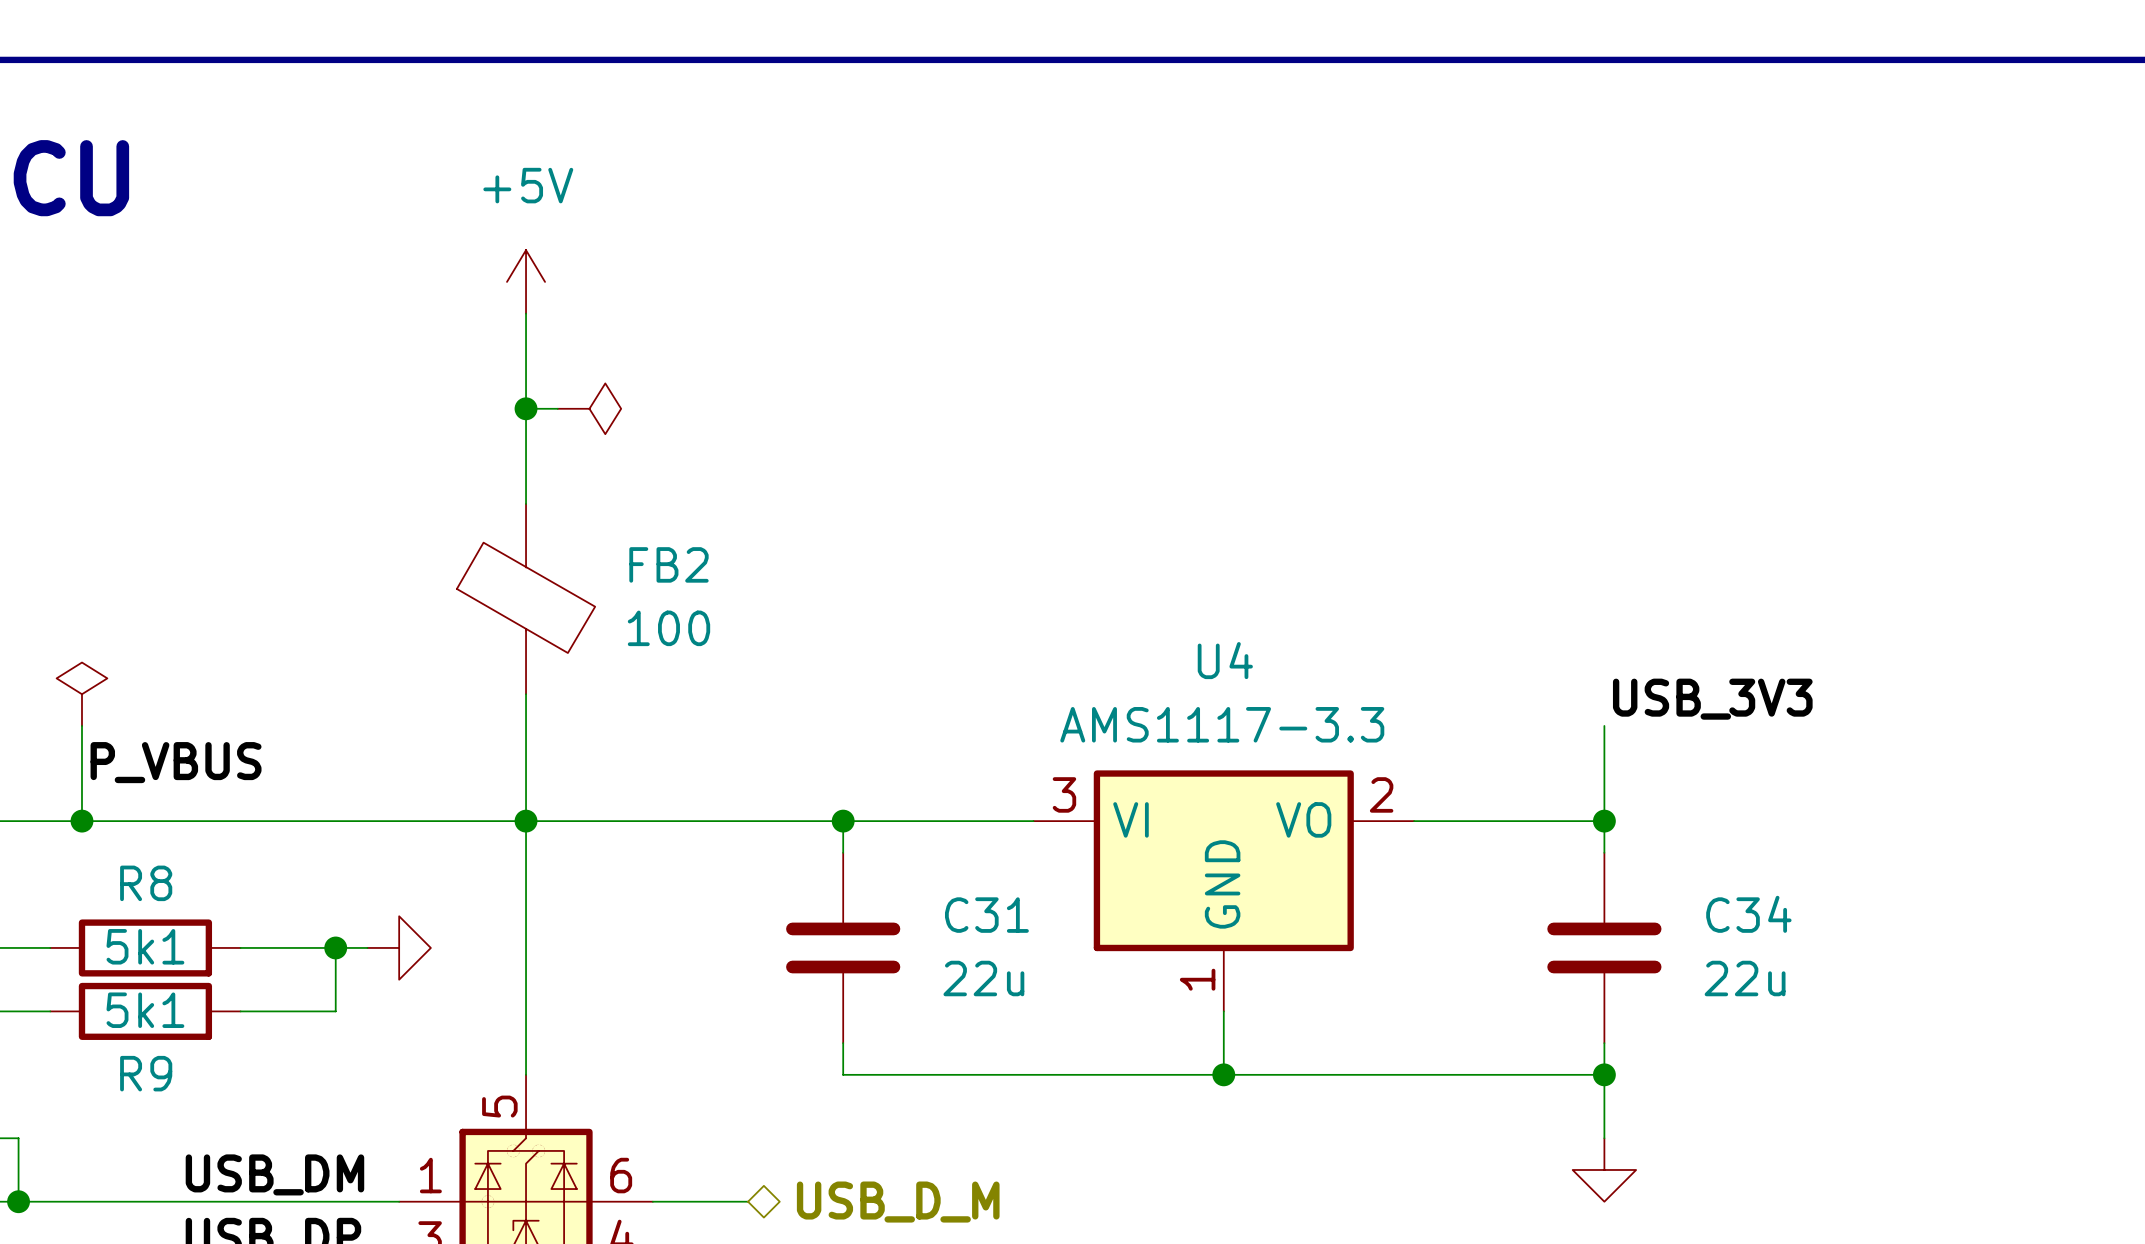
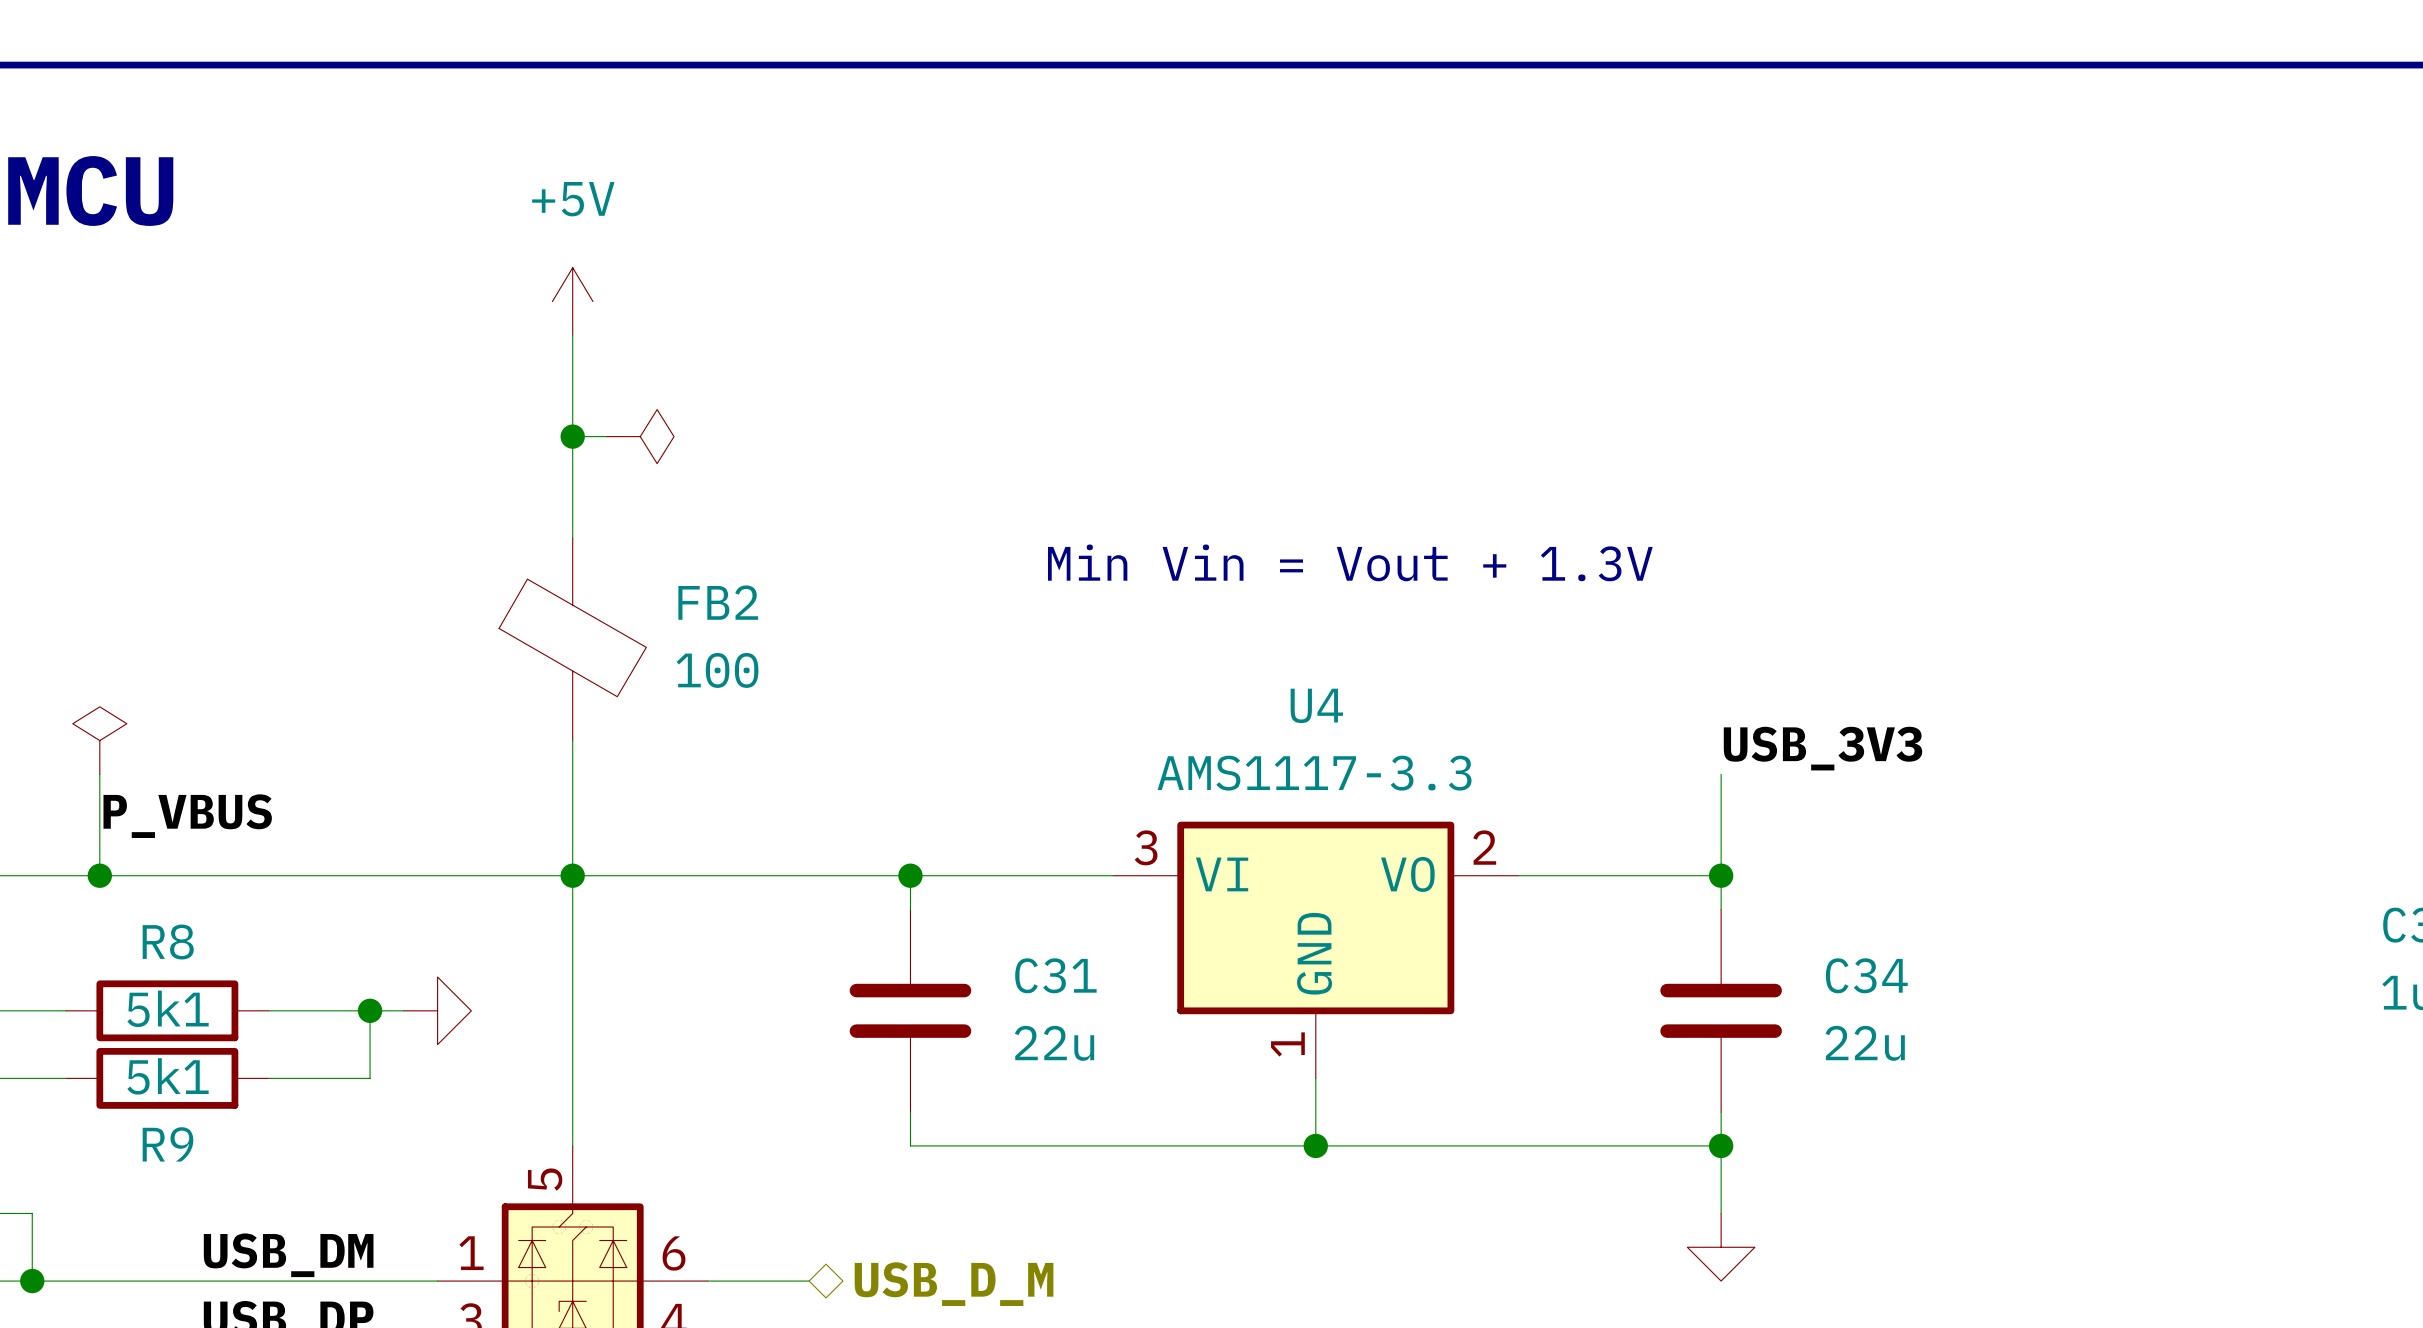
text: none -> Min Vin = Vout + 1.3V (1350, 562)

